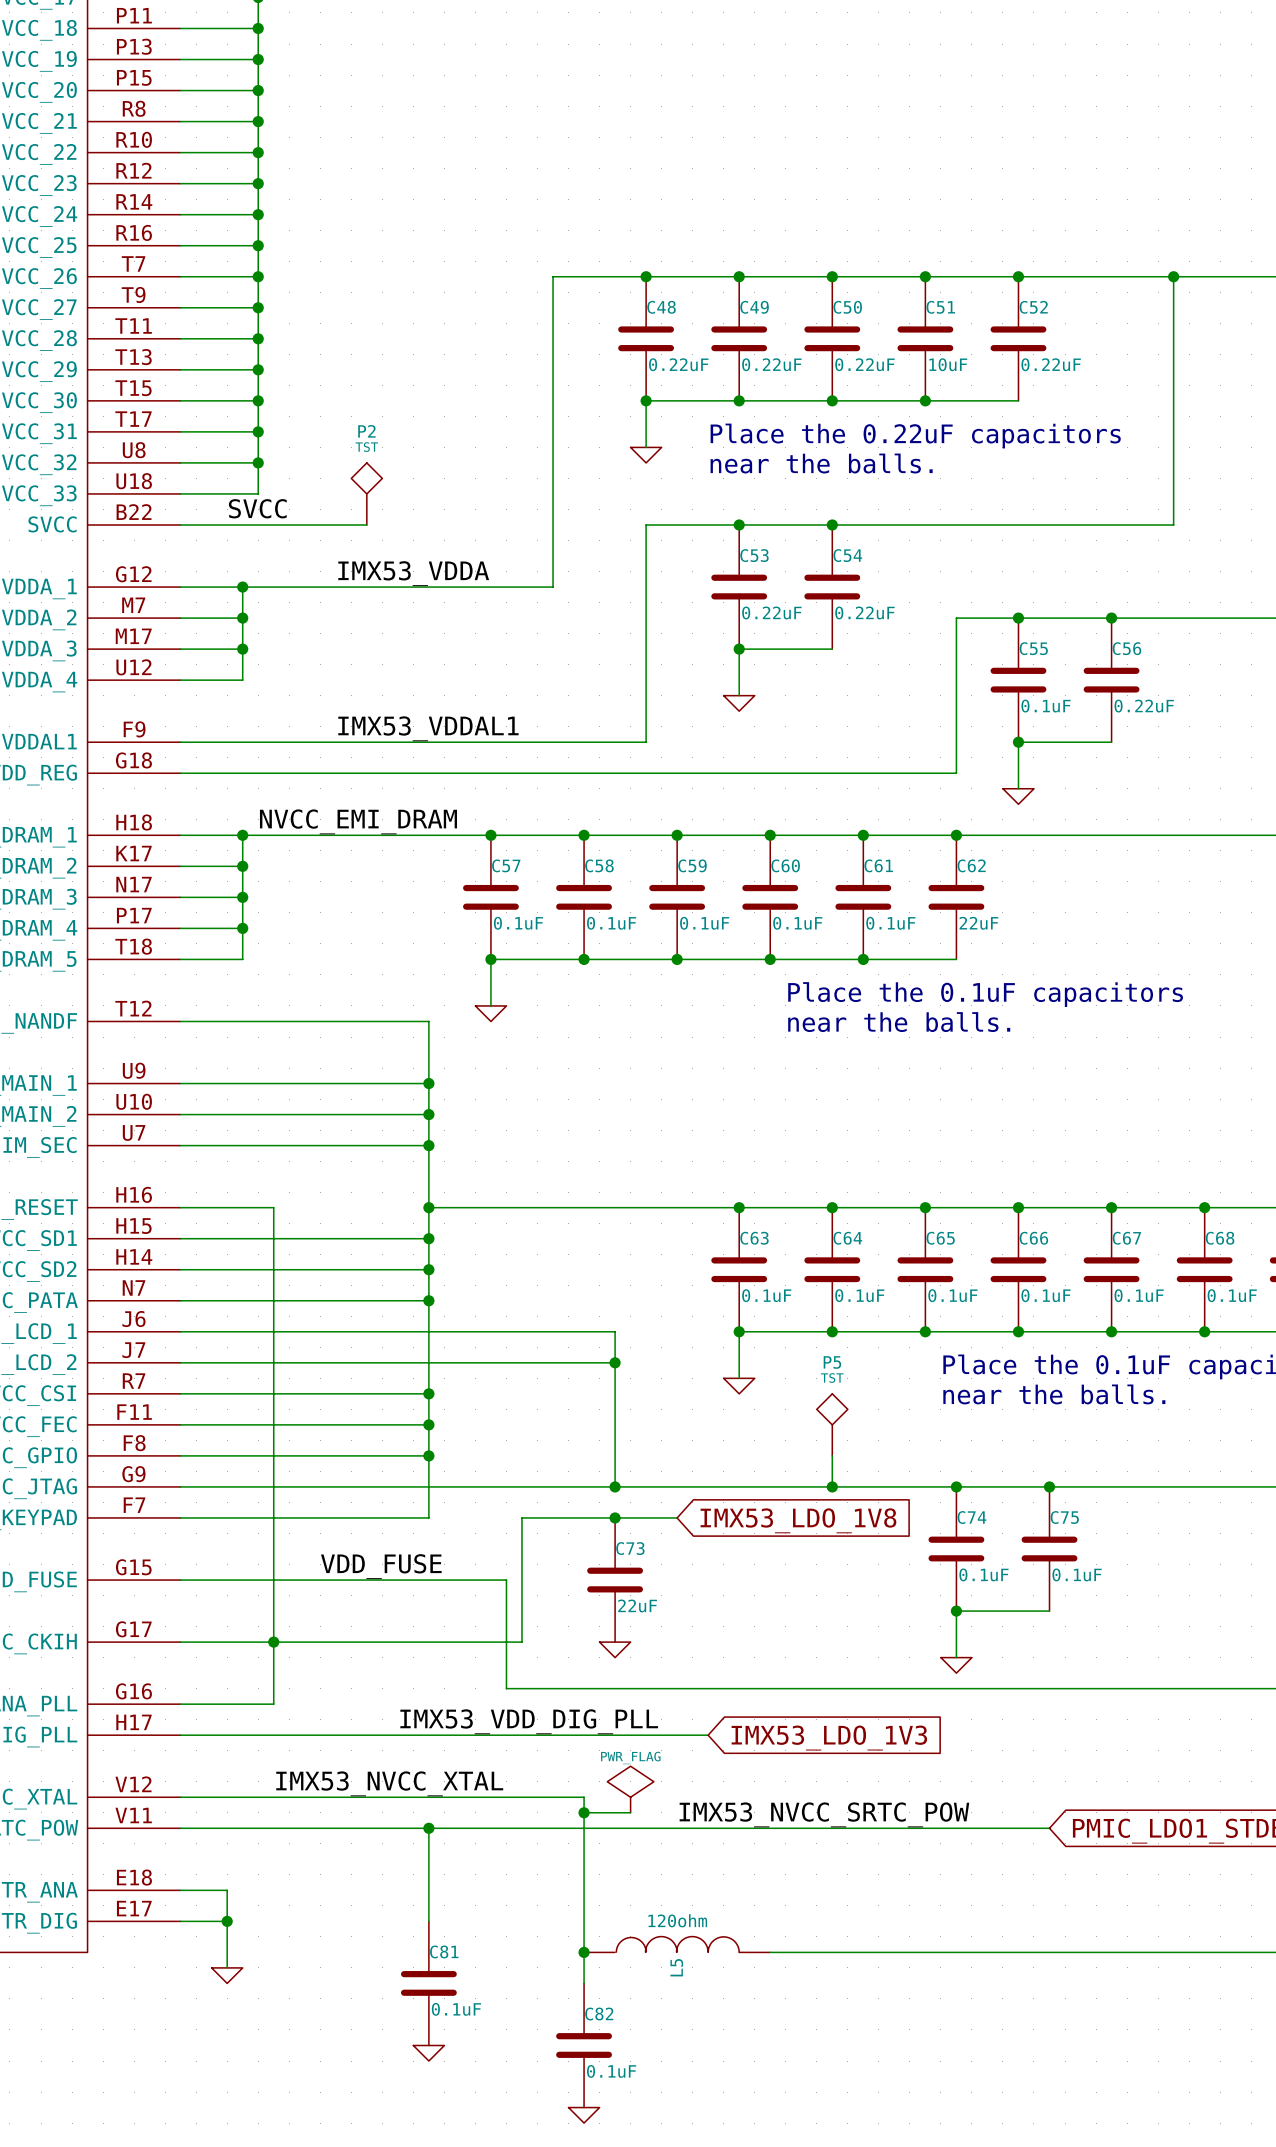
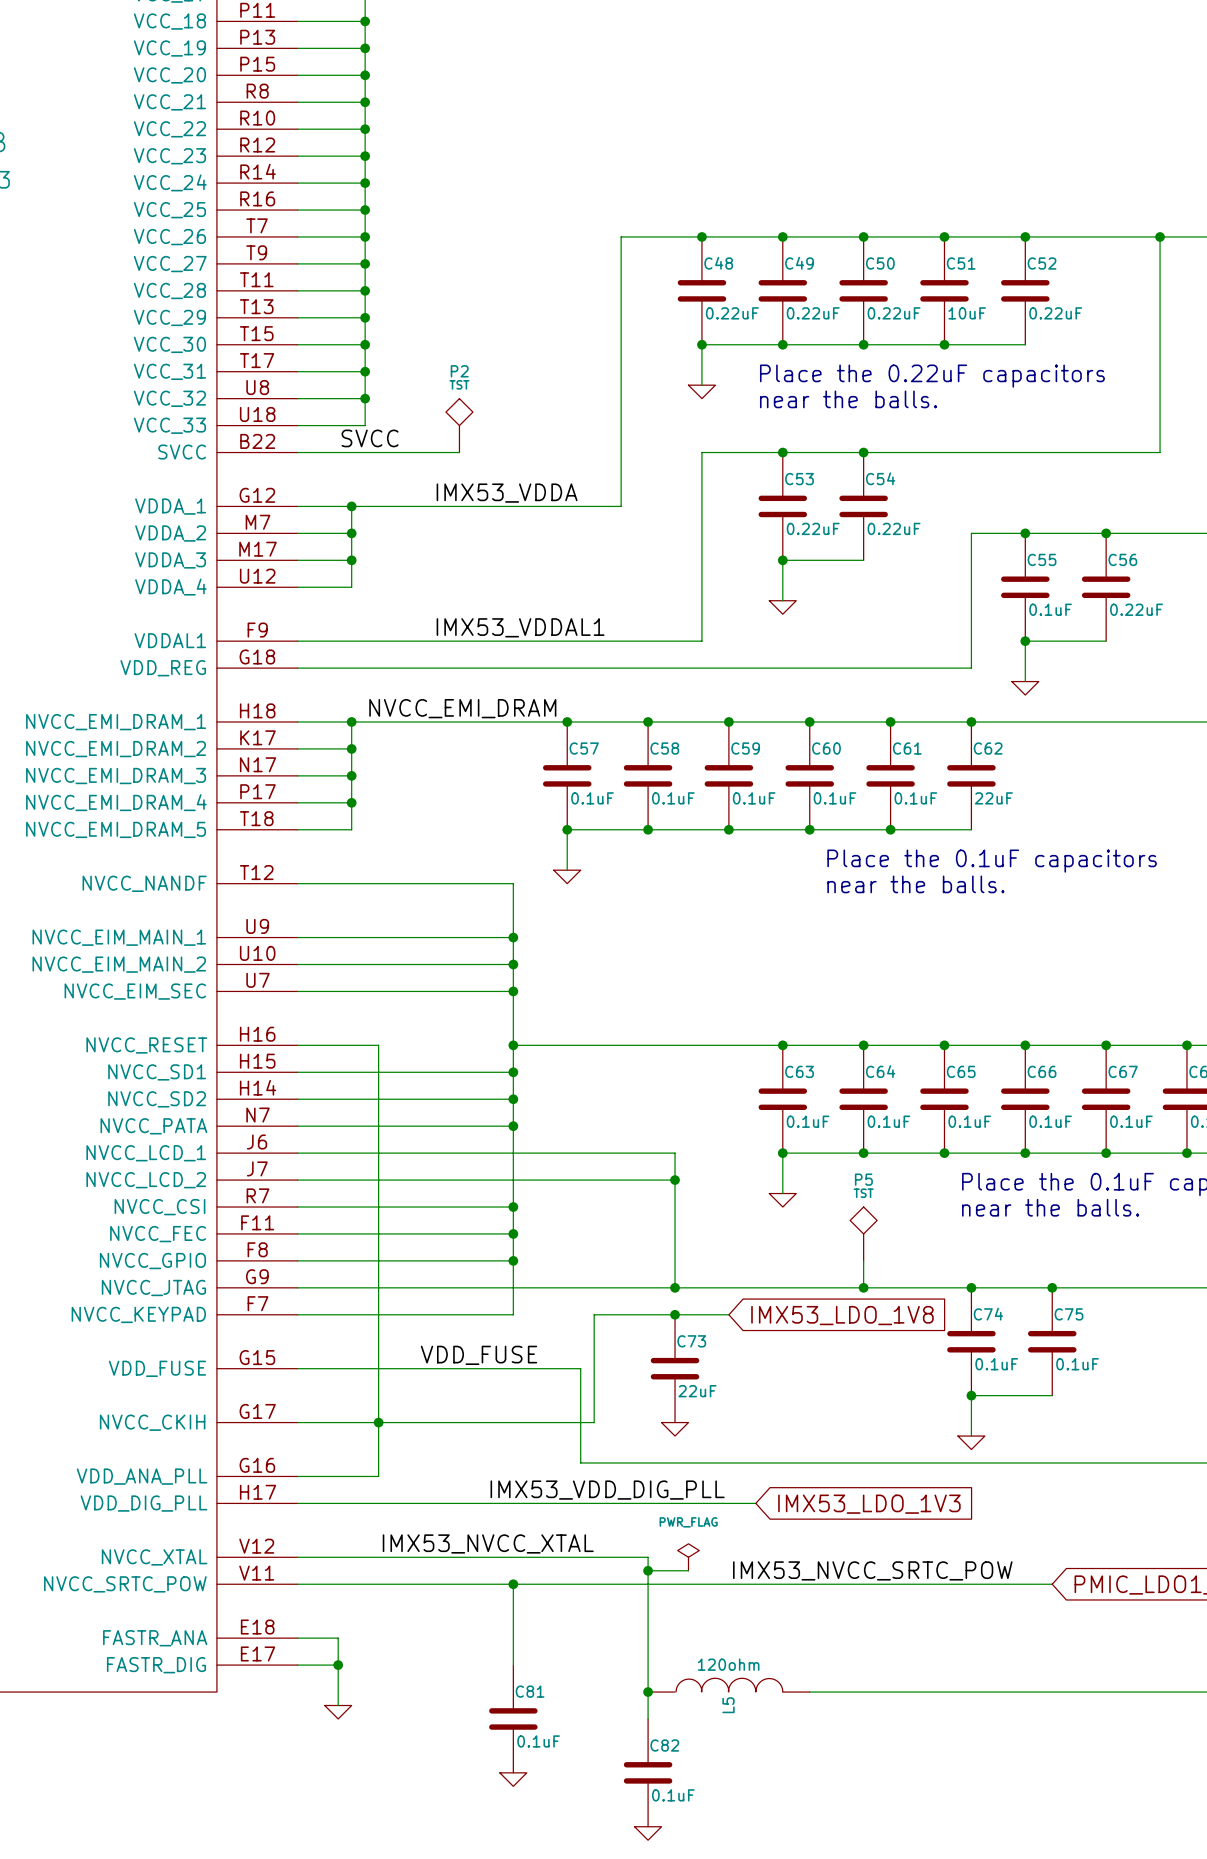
power symbol shape: [607, 1766, 654, 1813] -> [677, 1543, 700, 1571]

